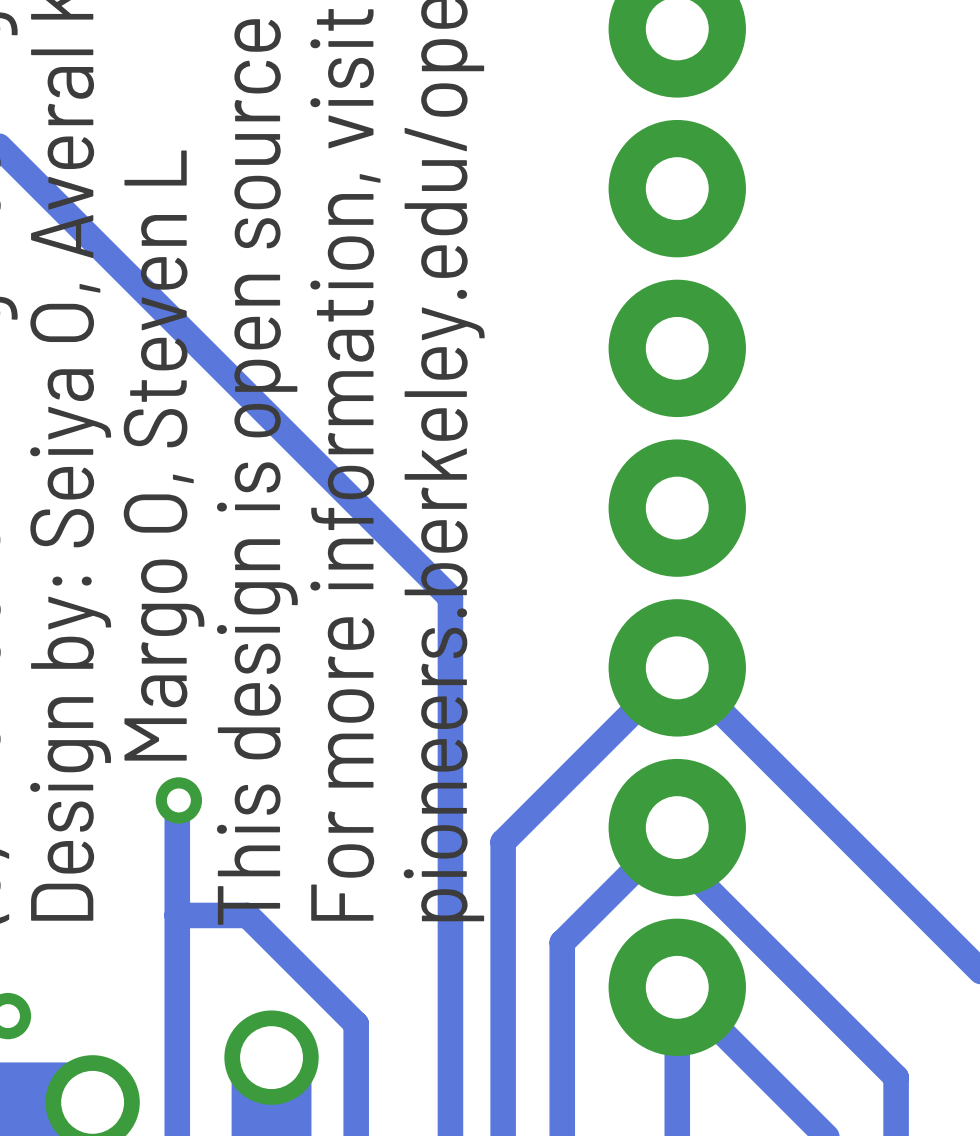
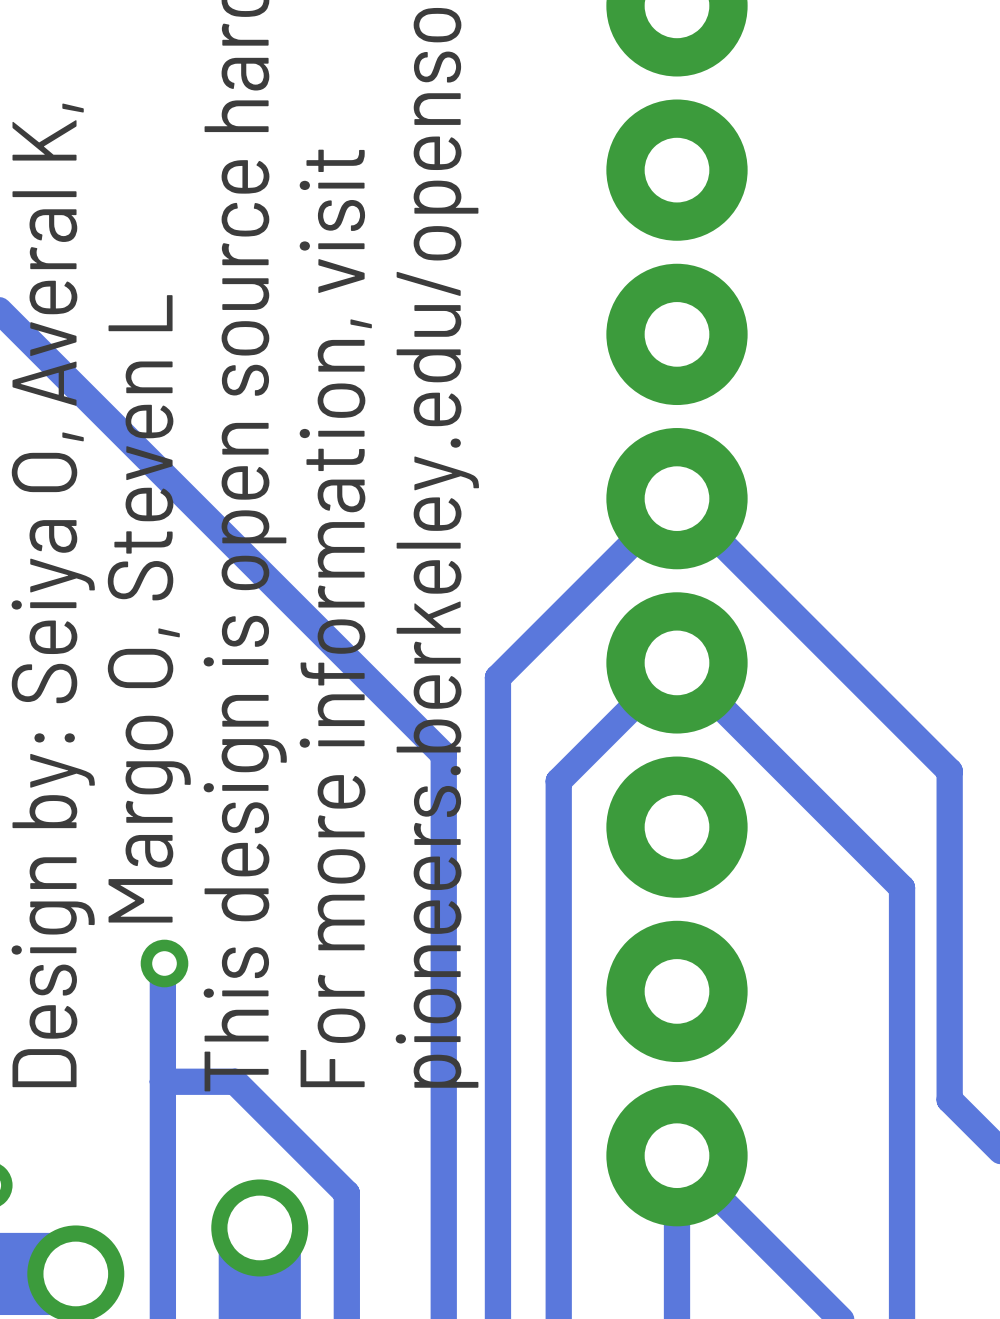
track: (503, 841) (677, 667) (942, 933) -> (497, 1006) (497, 677) (676, 498) (949, 771) (949, 1099)
track: (562, 942) (677, 827) (677, 858) (896, 1077) -> (558, 1109) (558, 781) (676, 662) (902, 887) (902, 1248)

